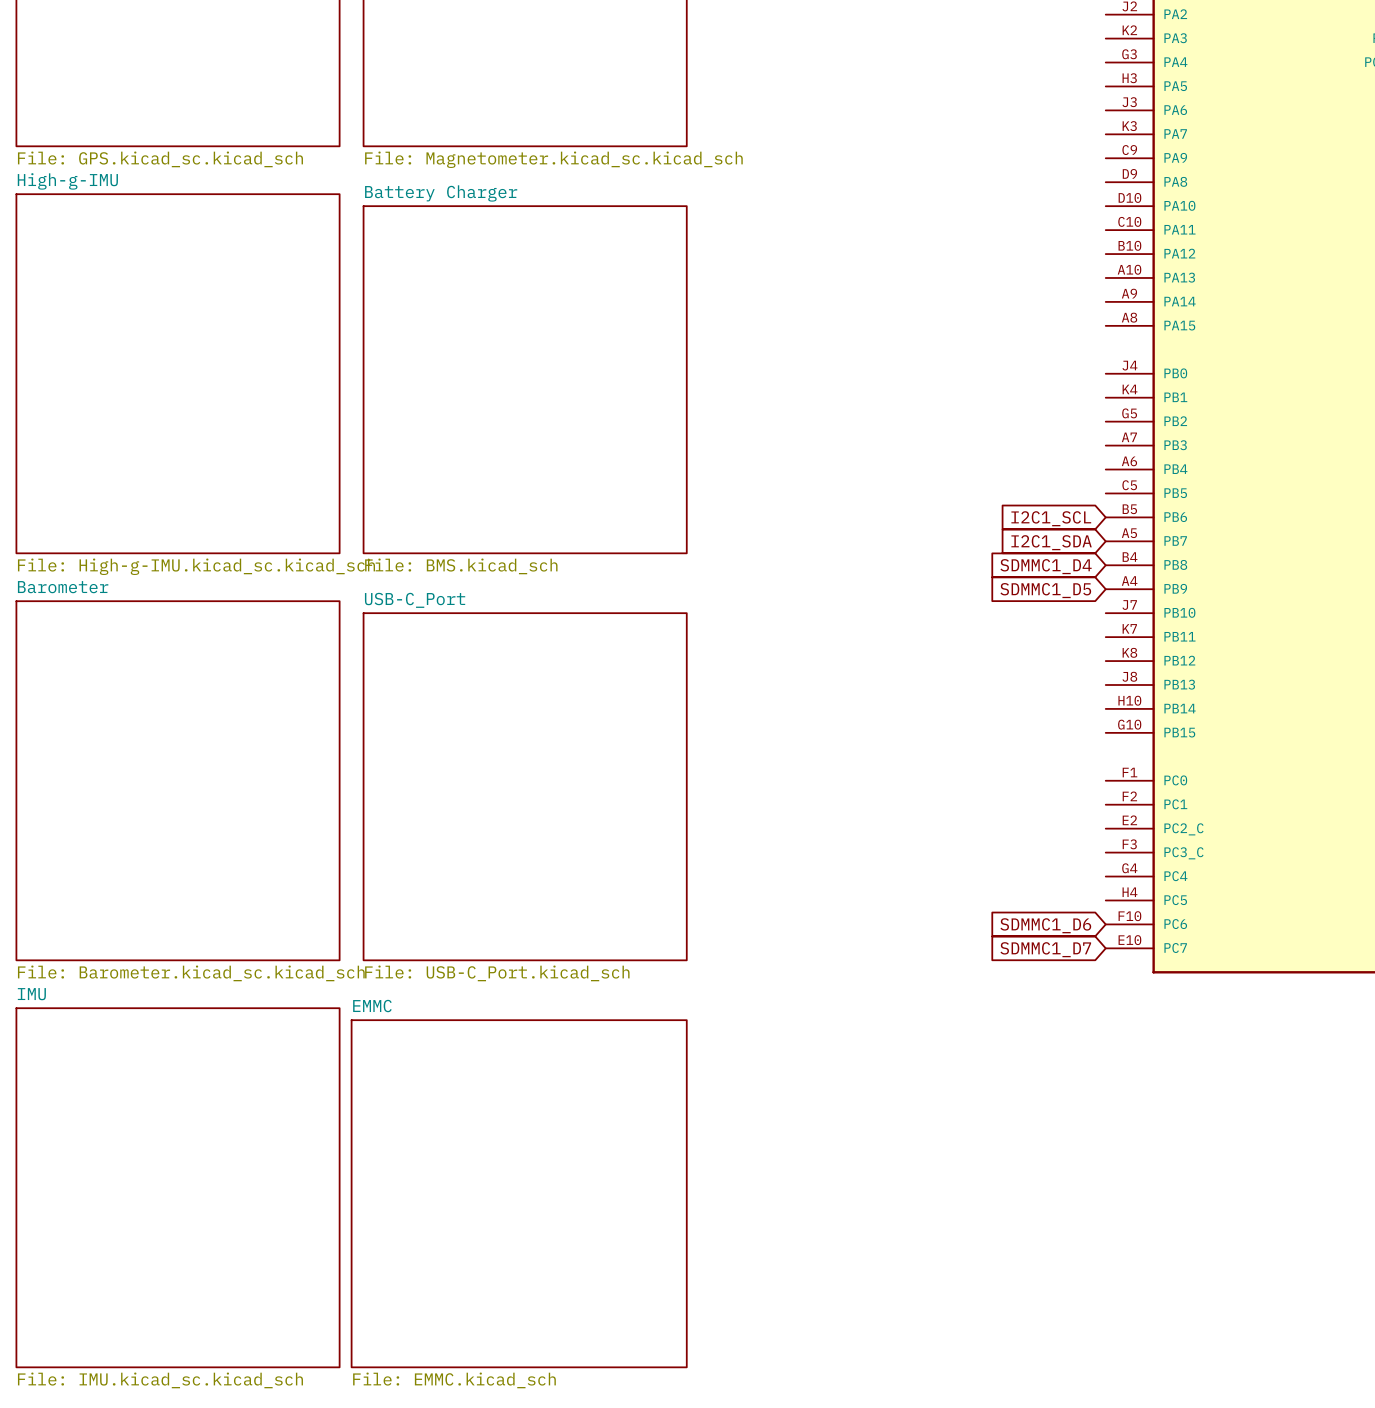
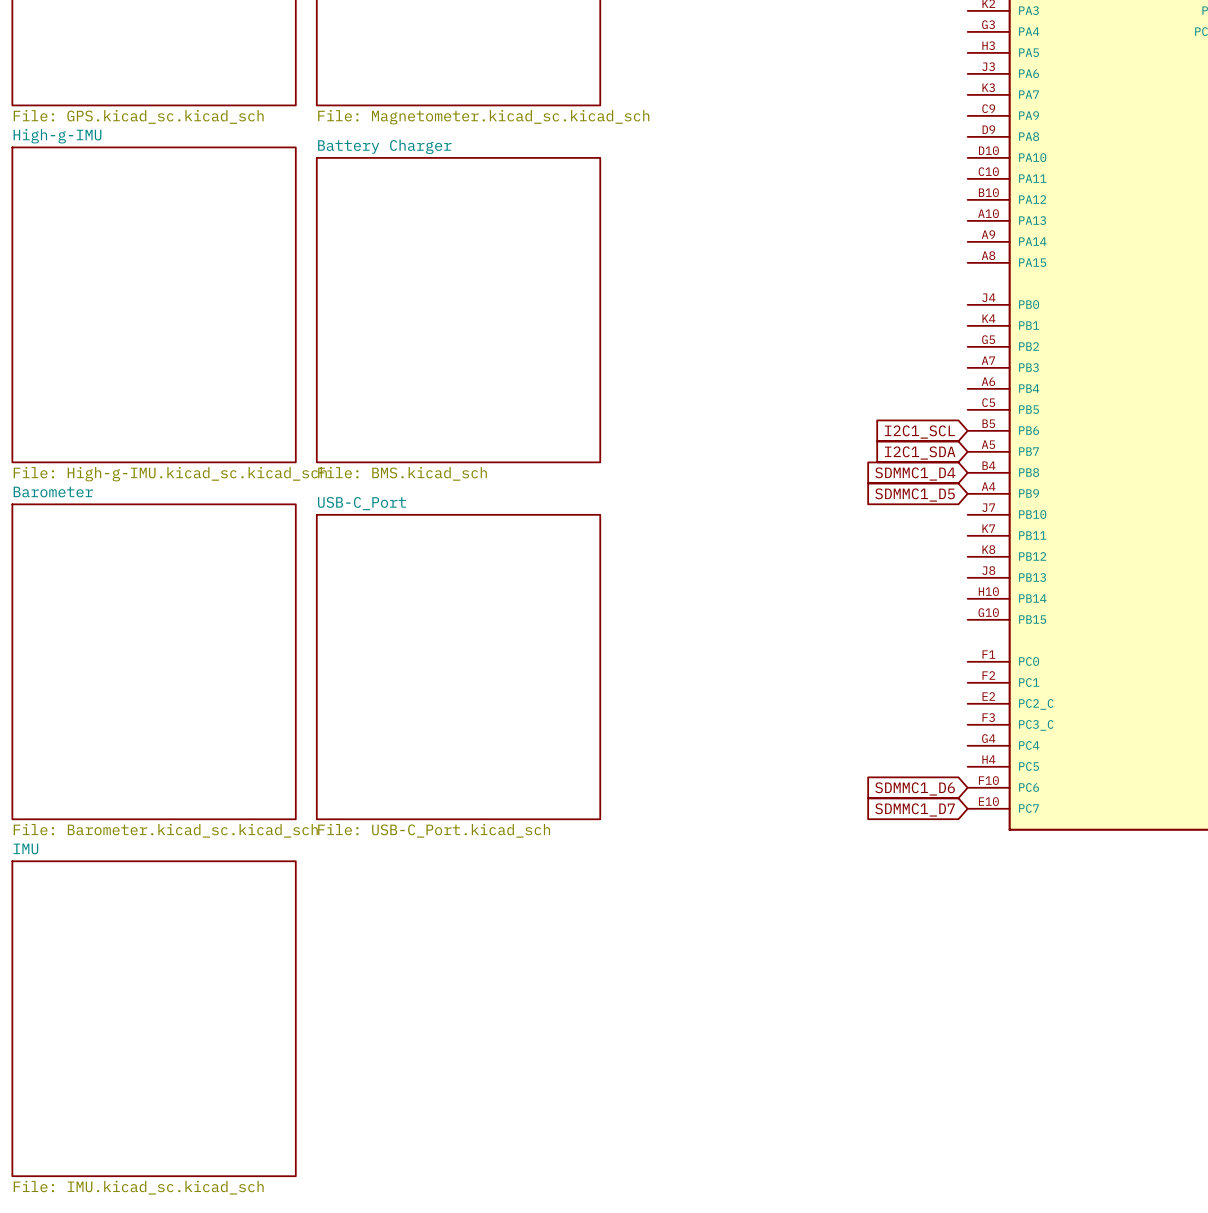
sheet EMMC: File: EMMC.kicad_sch (519, 1193) -> none

